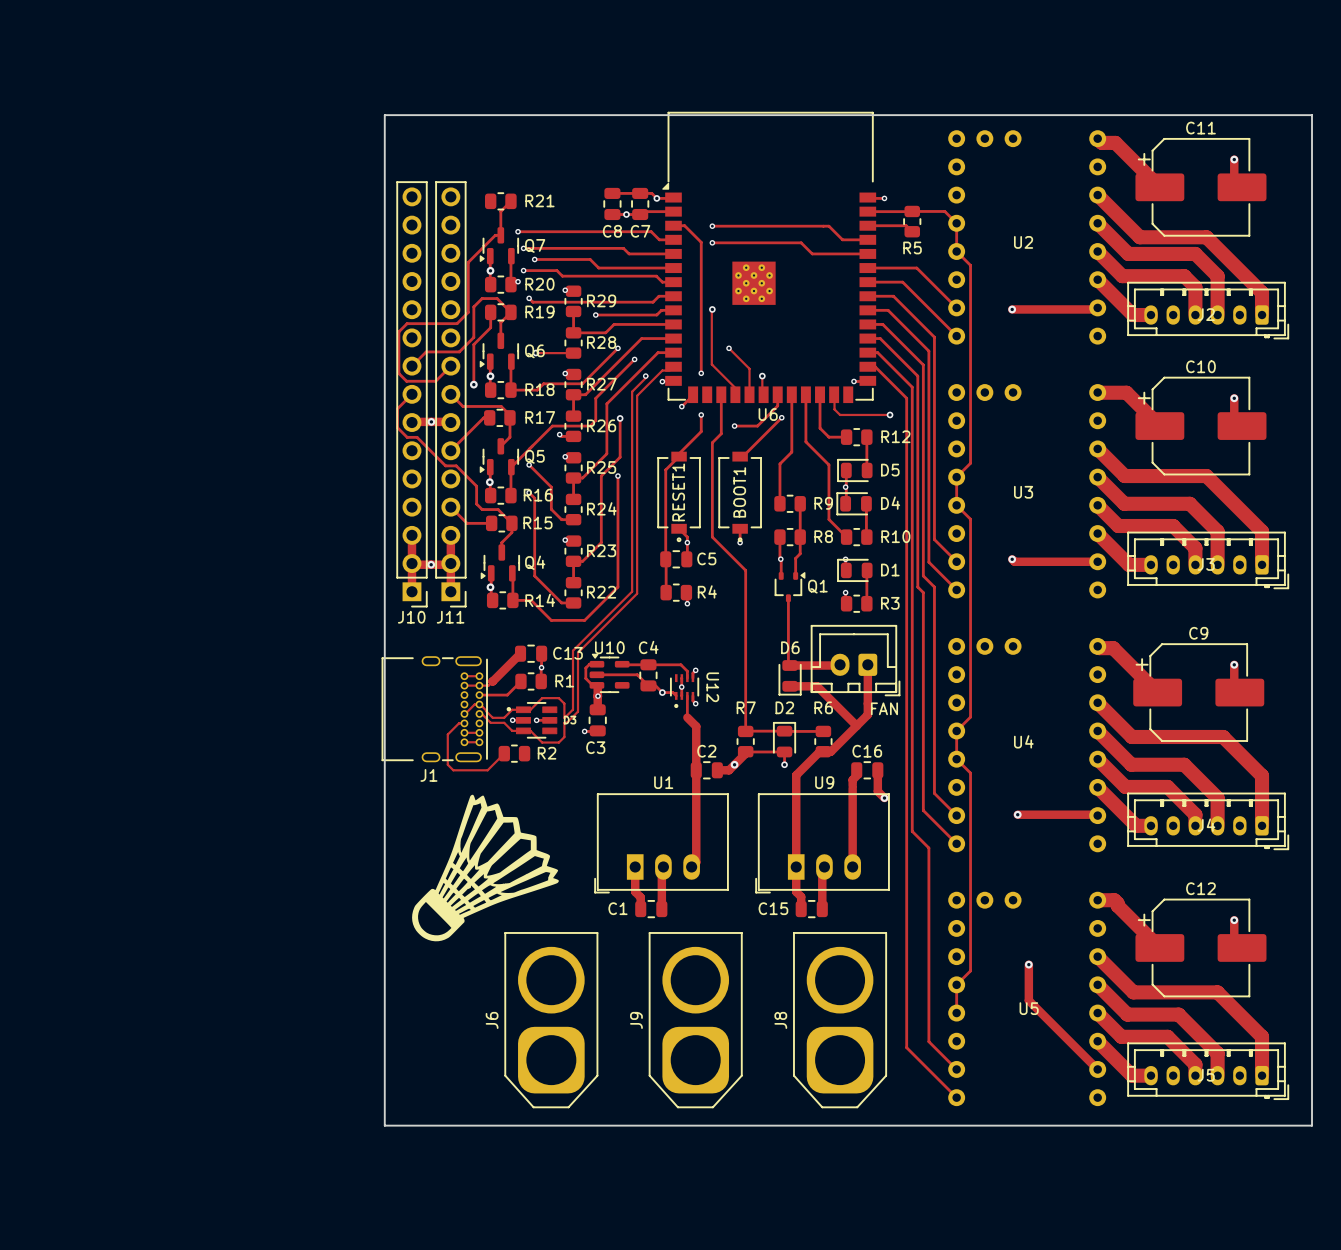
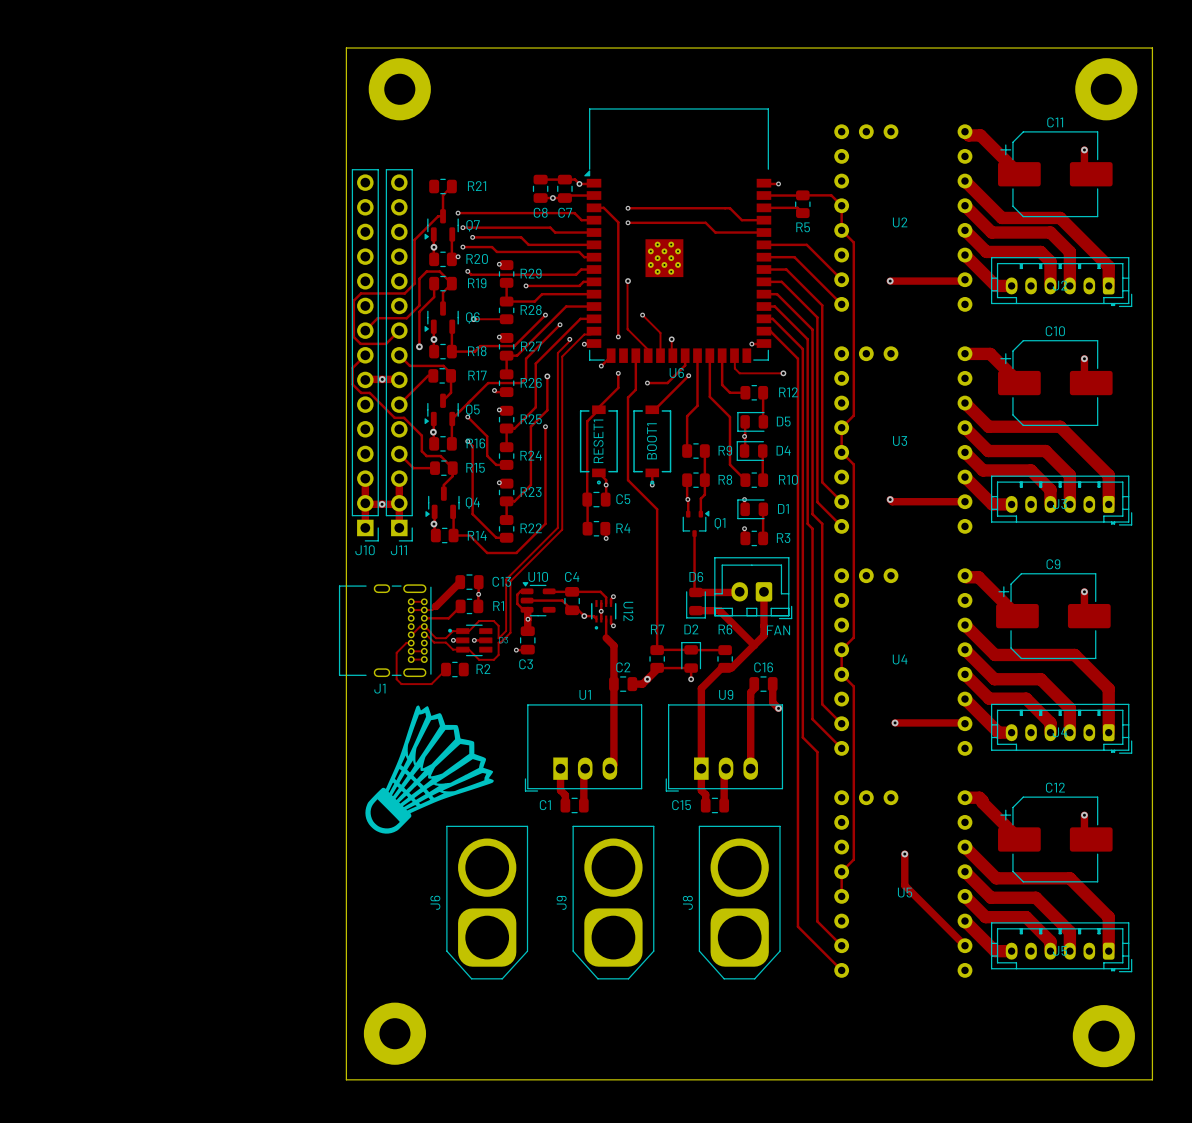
part: none -> (399, 89)
part: none -> (1106, 89)
board edge: (1312, 115) (384, 115) (384, 1125) (1312, 1125) -> (1152, 111) (1152, 48) (346, 48) (346, 1079) (1152, 1079) (1152, 994)
part: none -> (394, 1033)
part: none -> (1103, 1036)

